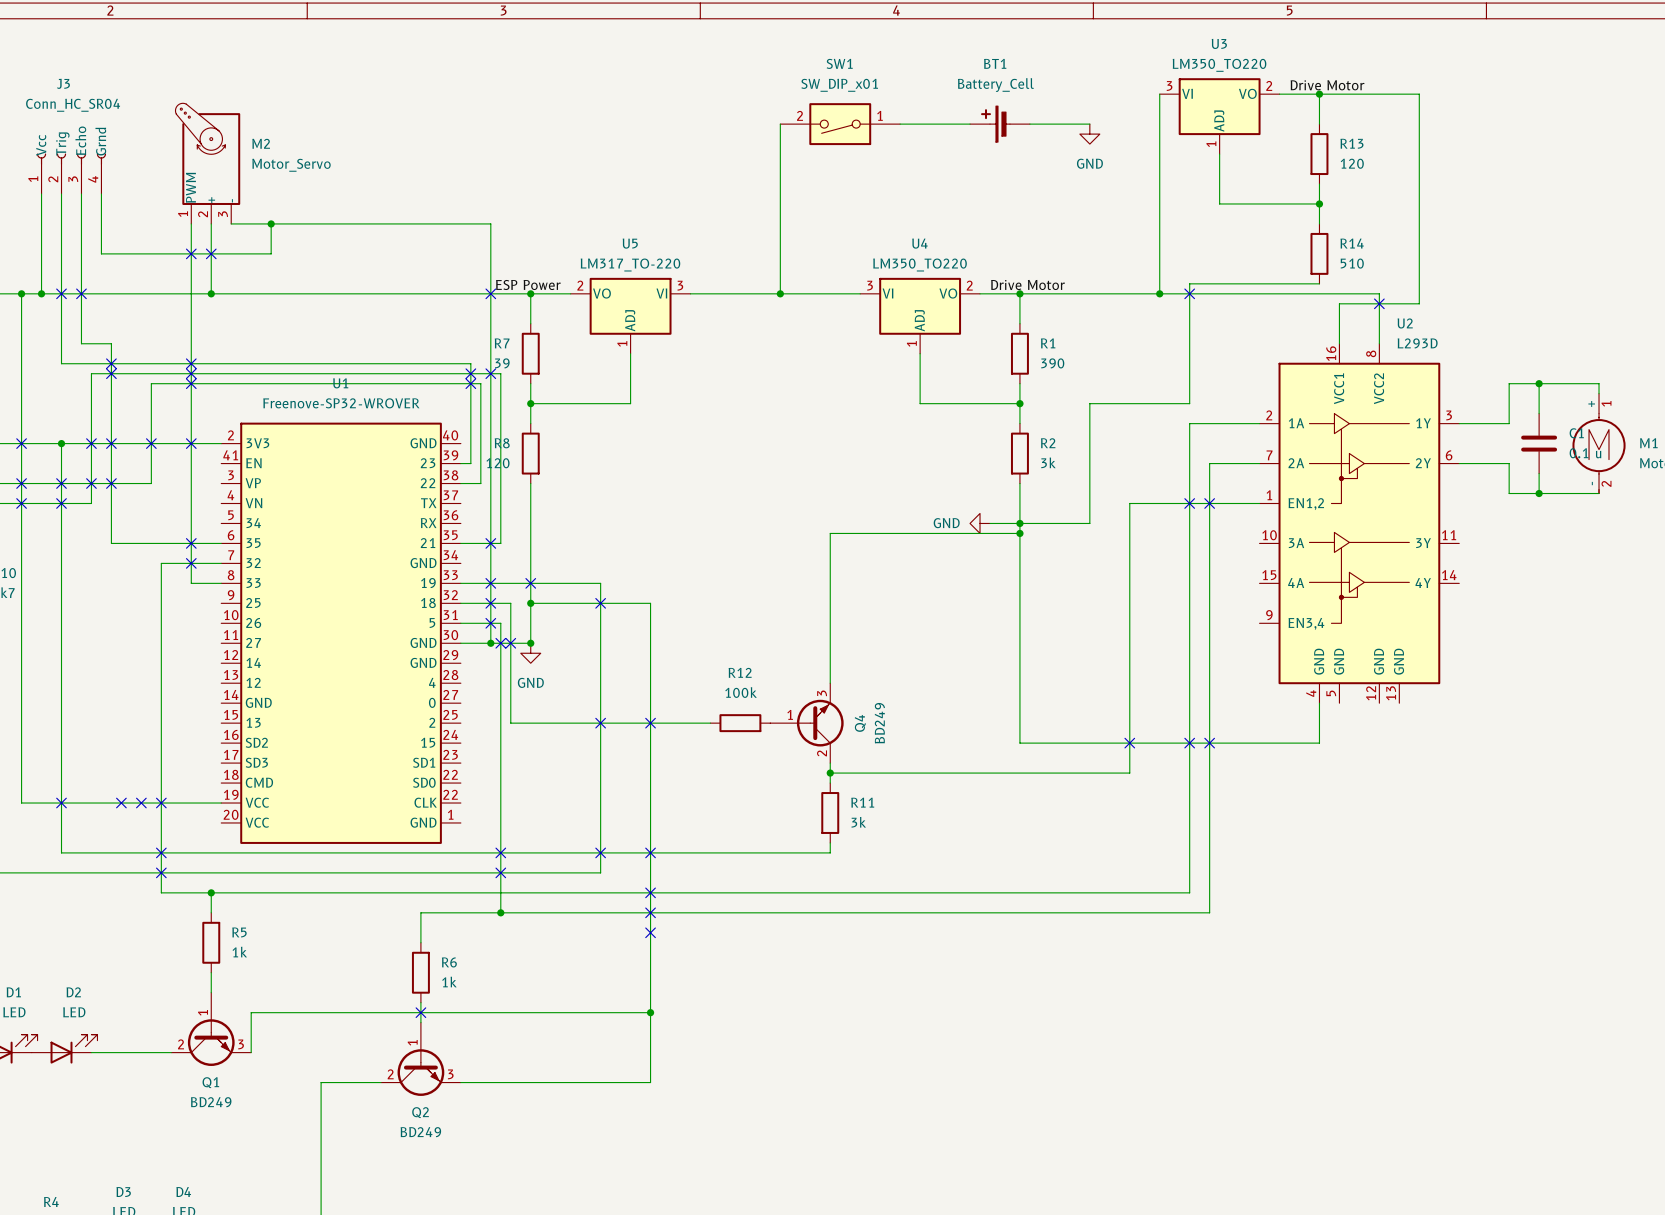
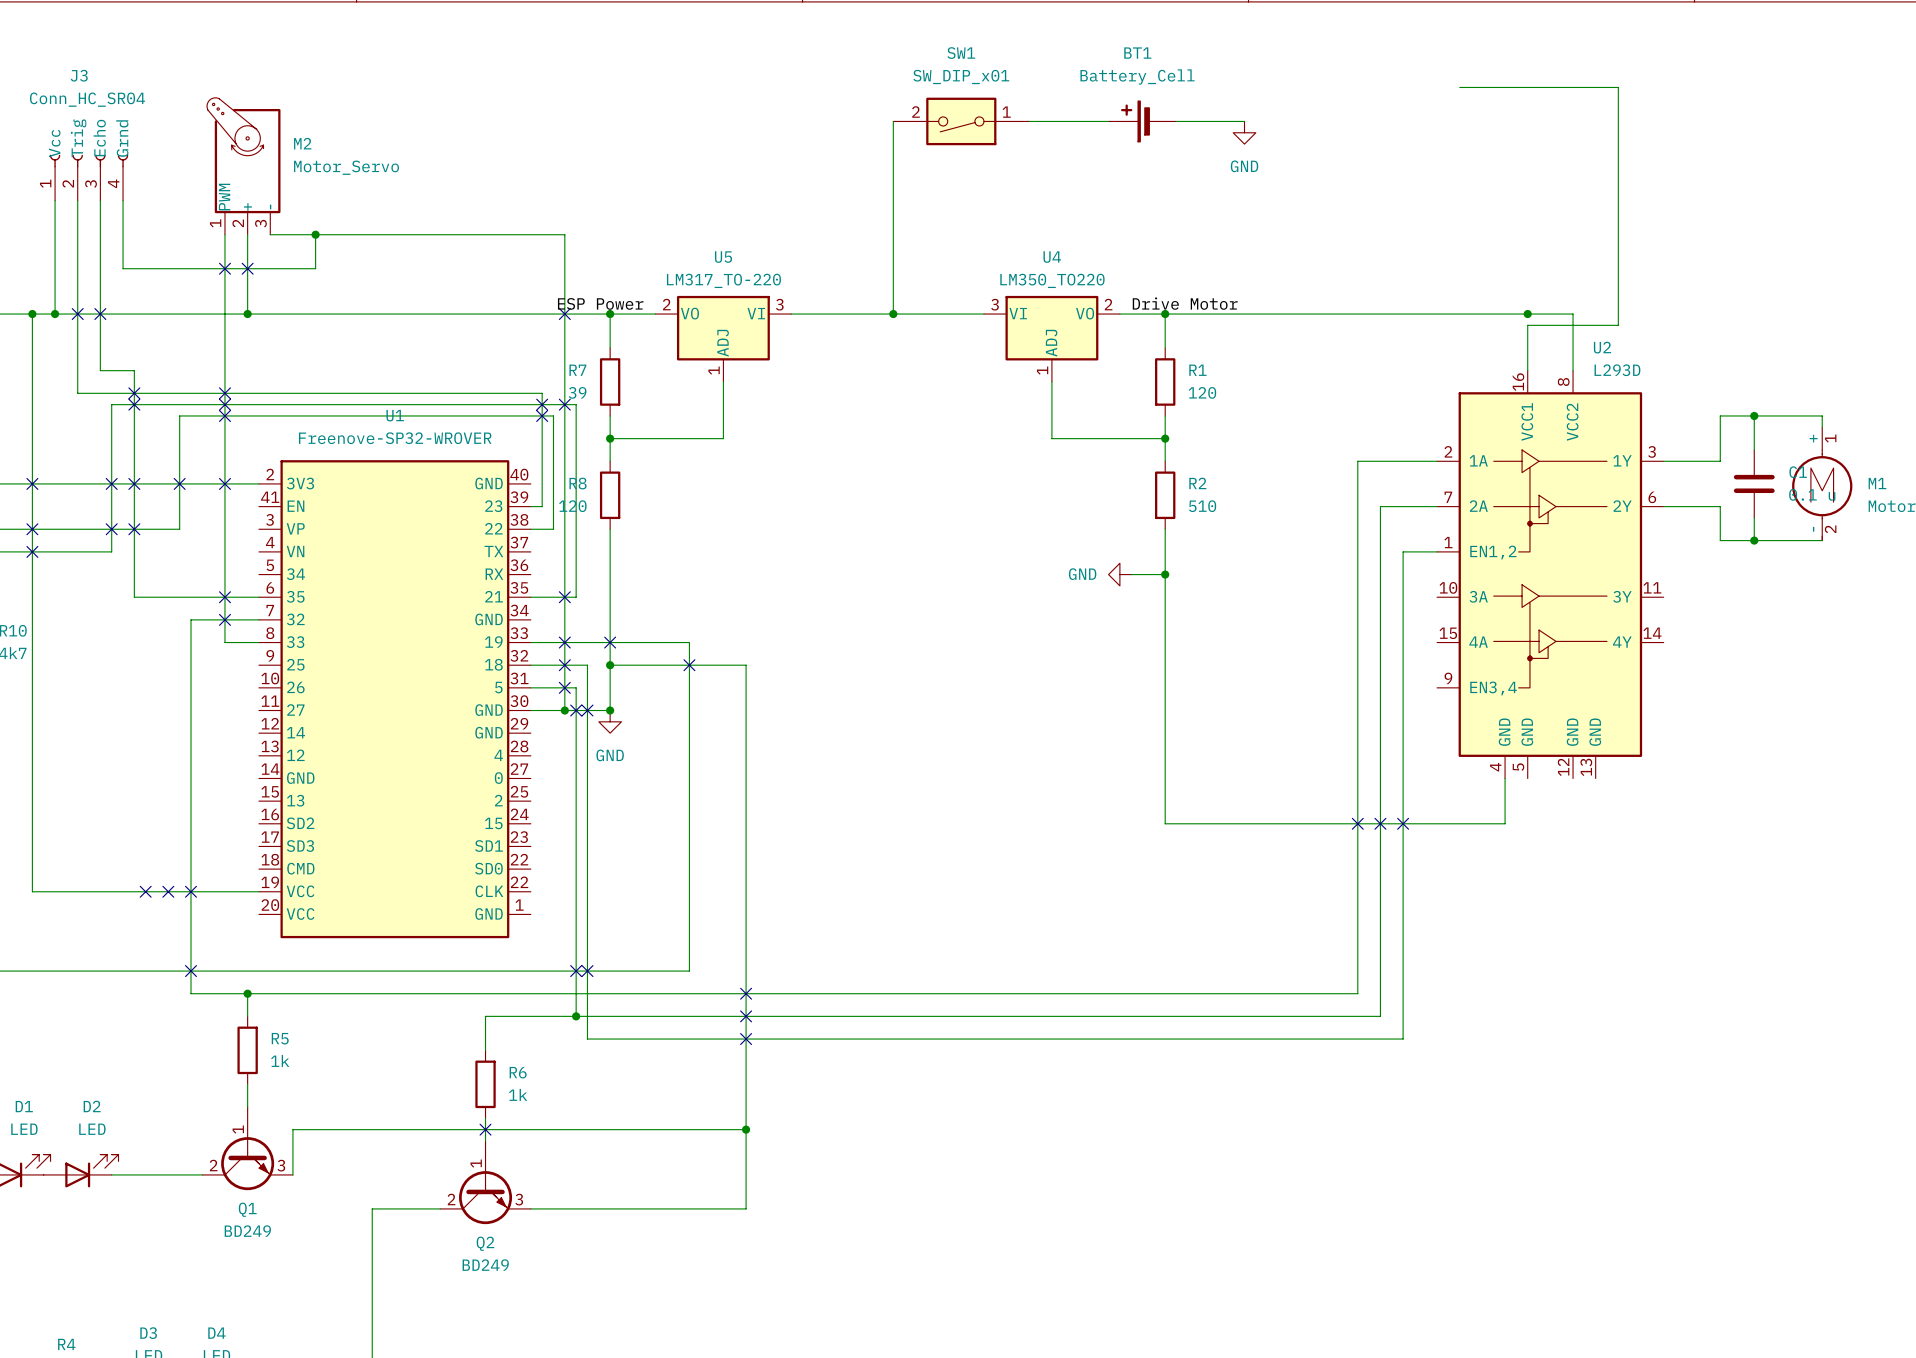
label: Drive Motor (1327, 85) -> none
wire: (1159, 94) (1159, 293) -> none
wire: (1319, 94) (1319, 124) -> none
junction: (1319, 94) -> none
U3: LM350_TO220 (1219, 116) -> none
wire: (1219, 154) (1219, 203) (1319, 203) -> none
R13: 120 (1319, 154) -> none
wire: (1319, 184) (1319, 223) -> none
junction: (1319, 203) -> none
R14: 510 (1319, 253) -> none
wire: (1319, 283) (1189, 283) (1189, 403) (1089, 403) (1089, 523) (1019, 523) -> none
junction: (1159, 293) -> none
no-connect mark: (1189, 293) -> none
junction: none -> (1527, 314)
no-connect mark: (1379, 303) -> none
R1 value: 390 (1052, 363) -> 120 (1202, 392)
wire: (61, 443) (61, 852) (830, 852) (830, 842) -> none
junction: (61, 443) -> none
R2 value: 3k (1048, 462) -> 510 (1202, 506)
no-connect mark: (61, 483) -> none
no-connect mark: (61, 503) -> none
no-connect mark: (1189, 503) -> none
no-connect mark: (1209, 503) -> none
wire: (1229, 503) (1129, 503) (1129, 773) (830, 773) -> (1403, 551) (1403, 1039) (587, 1039) (587, 801)
wire: (1019, 533) (830, 533) (830, 683) -> none
junction: (1019, 533) -> none
wire: (510, 723) (710, 723) -> none
no-connect mark: (600, 723) -> none
no-connect mark: (650, 723) -> none
R12: 100k (740, 723) -> none
Q4: BD249 (806, 723) -> none
no-connect mark: (1129, 743) -> none
no-connect mark: none -> (1403, 823)
wire: (830, 763) (830, 783) -> none
junction: (830, 773) -> none
no-connect mark: (61, 803) -> none
R11: 3k (830, 812) -> none
no-connect mark: (161, 852) -> none
no-connect mark position: (500, 852) -> (587, 971)
no-connect mark: (600, 852) -> none
no-connect mark: (650, 852) -> none

